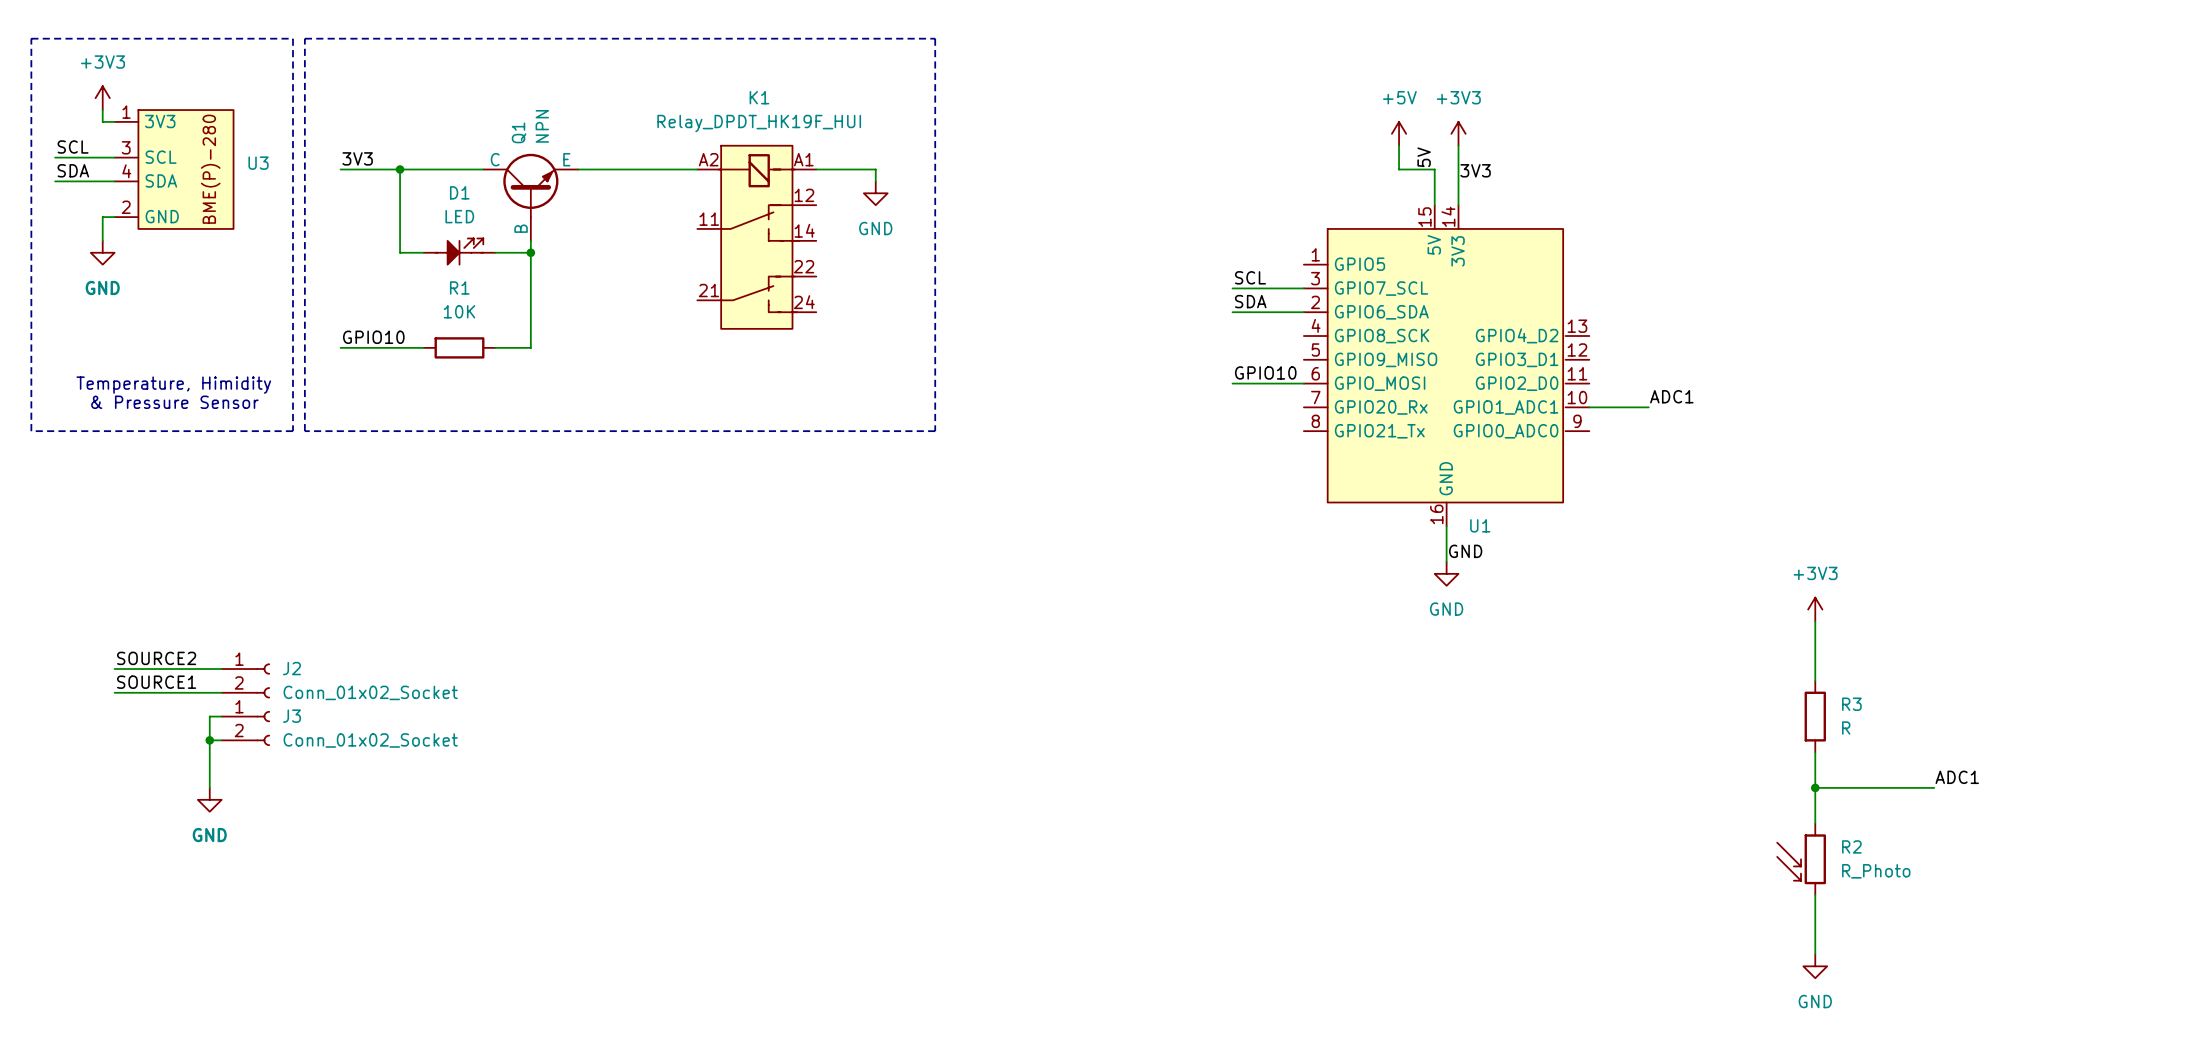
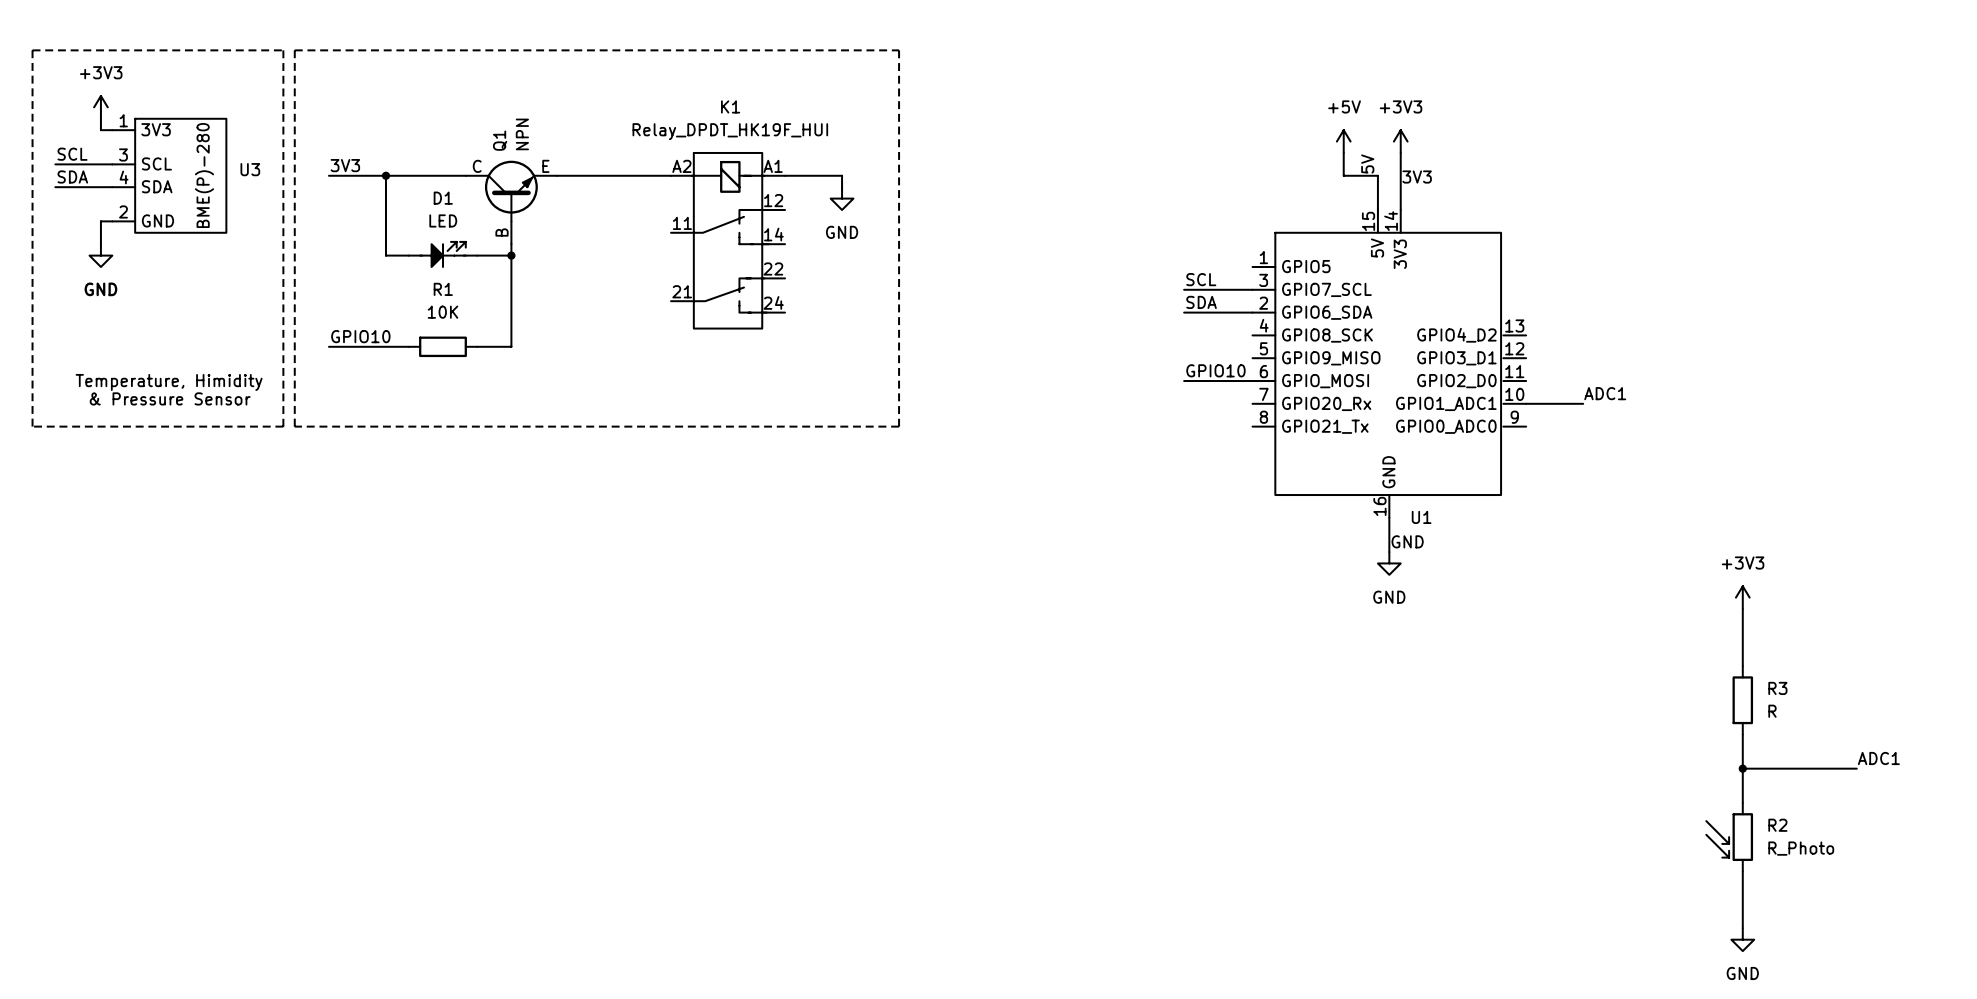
label: SOURCE2 (156, 658) -> none
wire: (114, 669) (221, 669) -> none
J2: Conn_01x02_Socket (245, 680) -> none
label: SOURCE1 (156, 682) -> none
wire: (114, 692) (221, 692) -> none
wire: (221, 716) (209, 716) (209, 787) -> none
J3: Conn_01x02_Socket (245, 728) -> none
wire: (209, 740) (221, 740) -> none
junction: (209, 740) -> none
power symbol: GND (209, 799) -> none

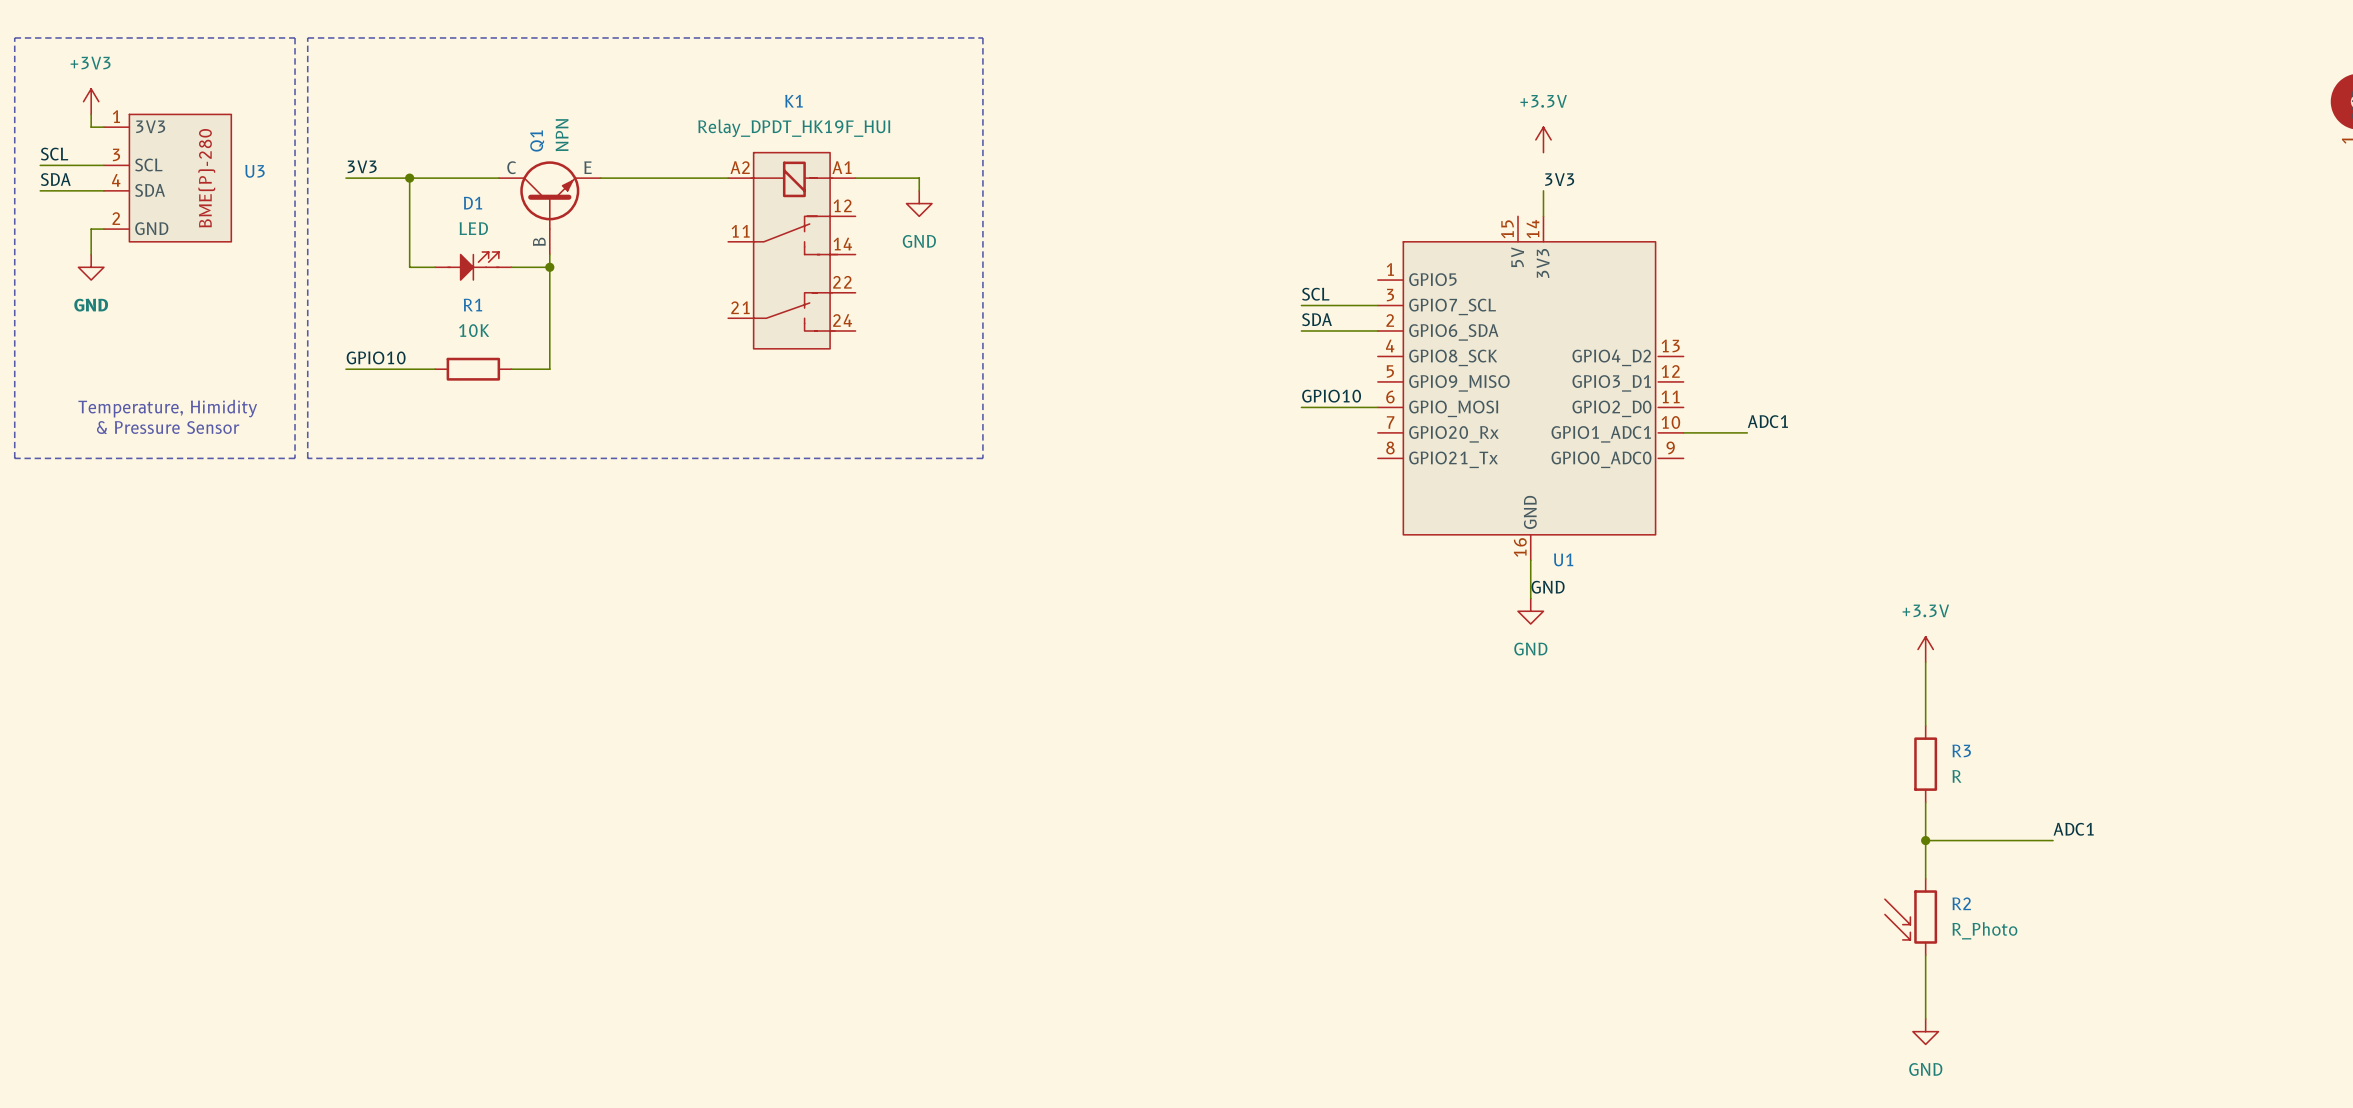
power symbol: +5V (1343, 141) -> none
power symbol: +3V3 (1400, 141) -> +3.3V (1543, 139)
wire: (1343, 152) (1343, 175) (1377, 175) (1377, 209) -> none
wire: (1400, 152) (1400, 187) -> none
label: 5V (1367, 164) -> none
power symbol: +3V3 (1742, 597) -> +3.3V (1925, 649)

